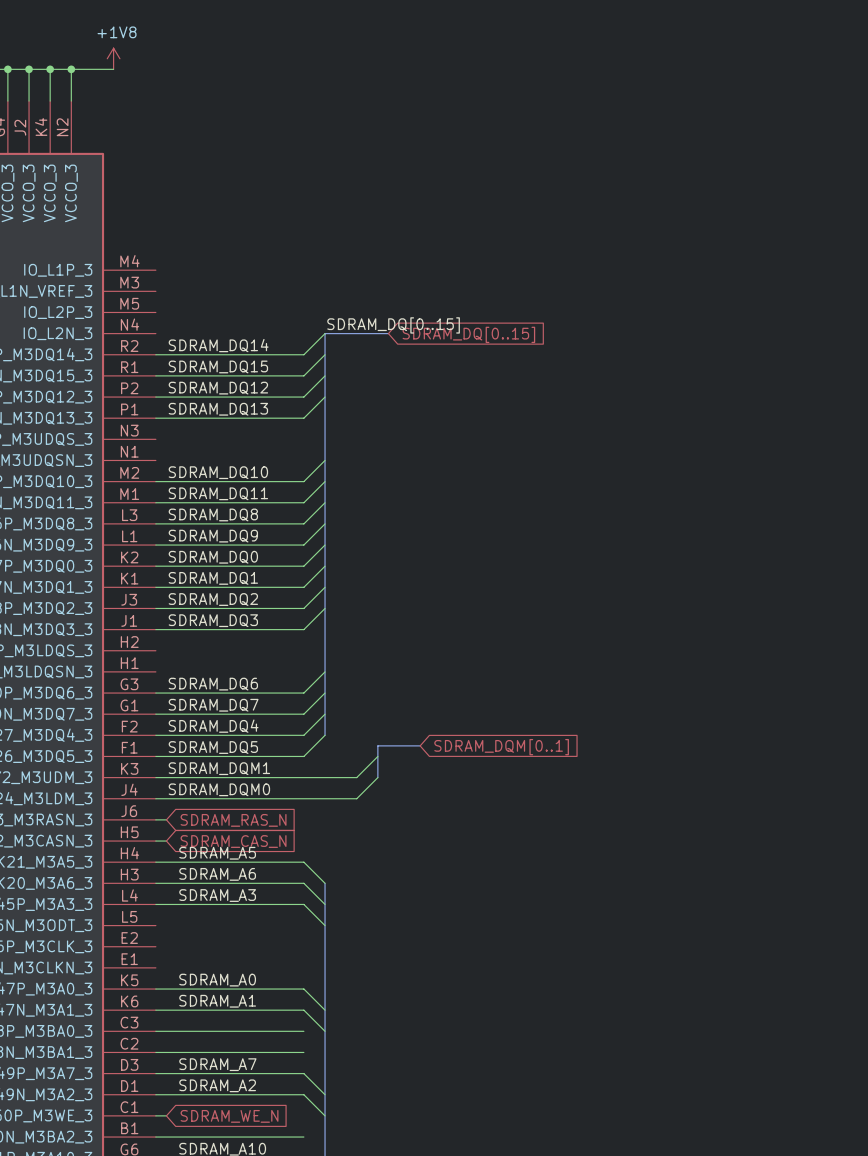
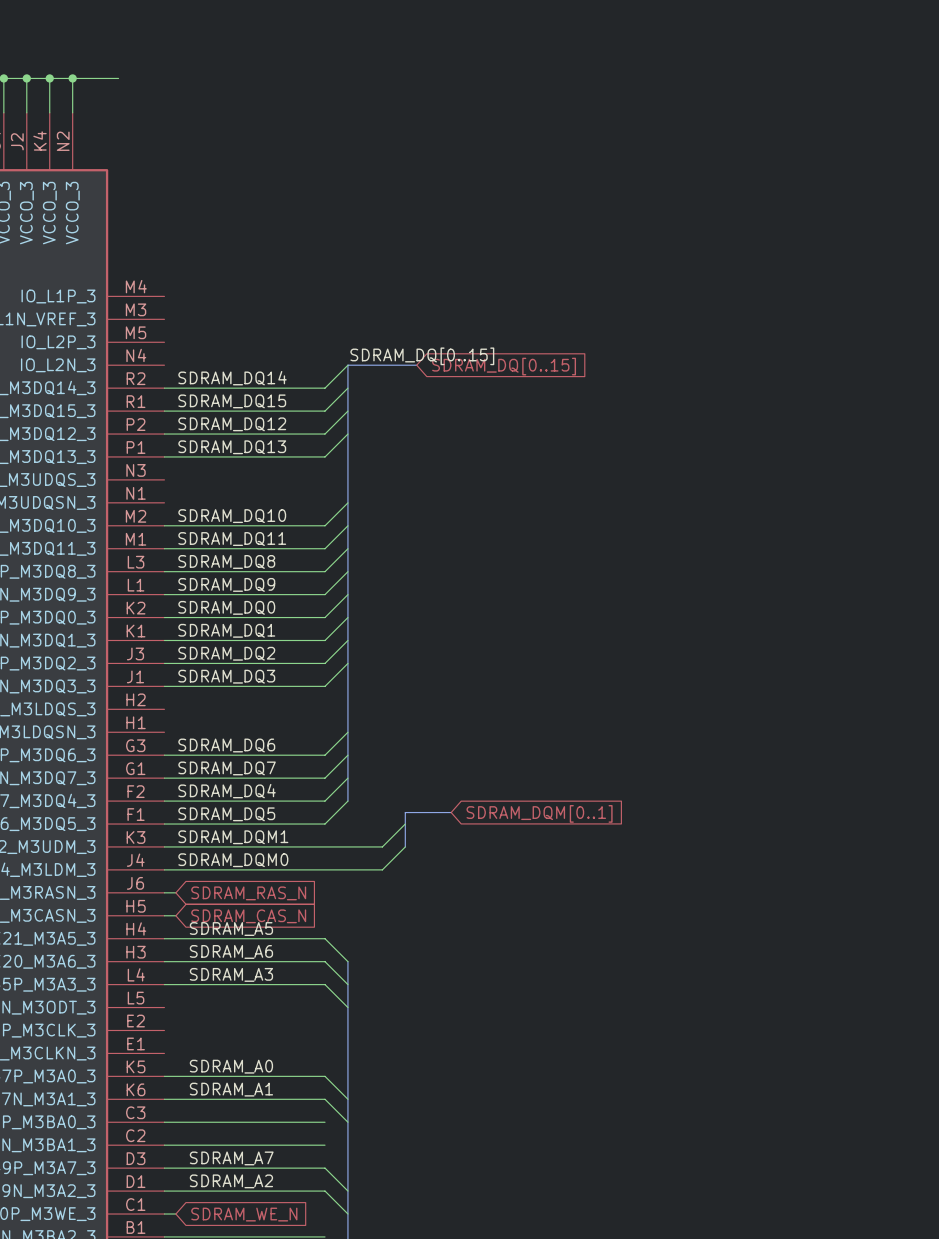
power symbol: +1V8 (113, 58) -> none

